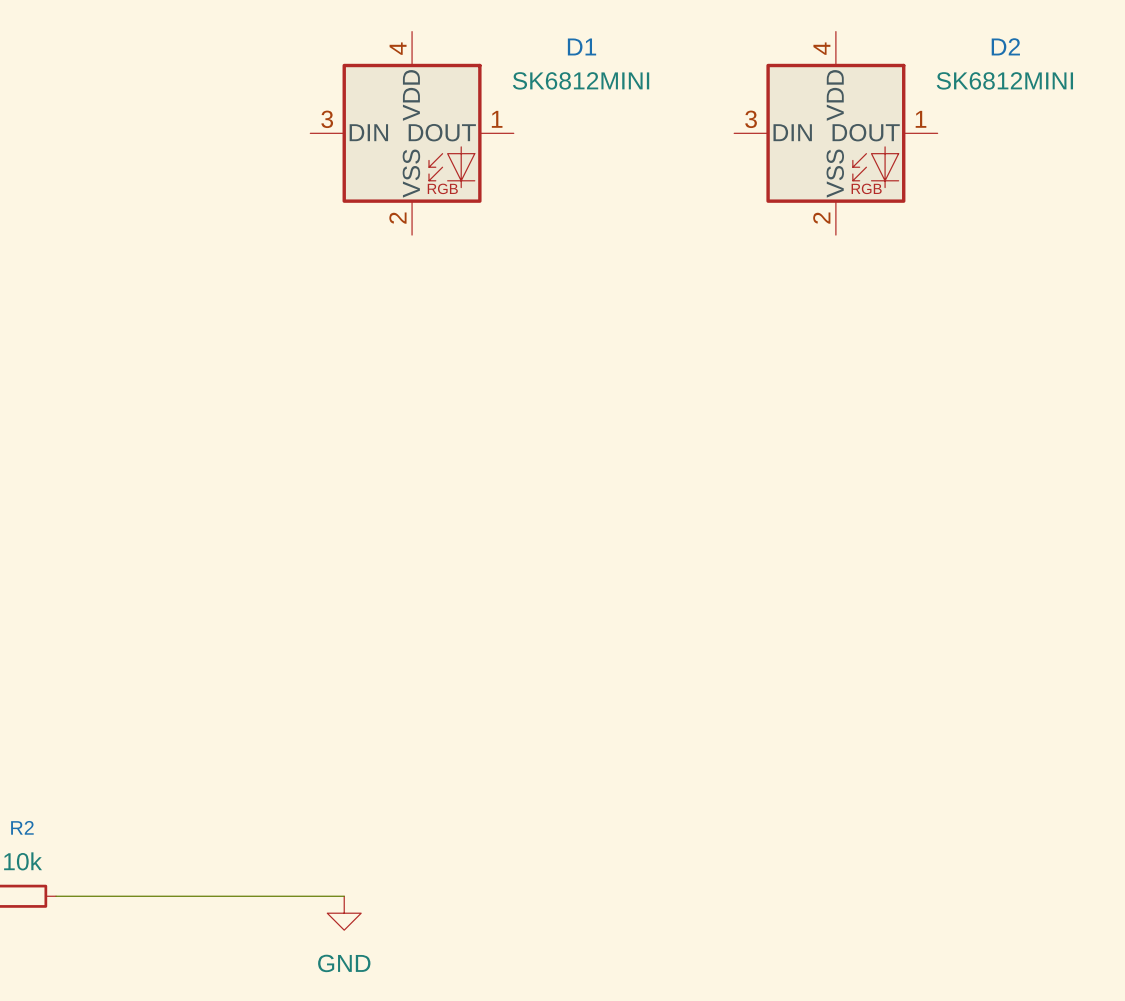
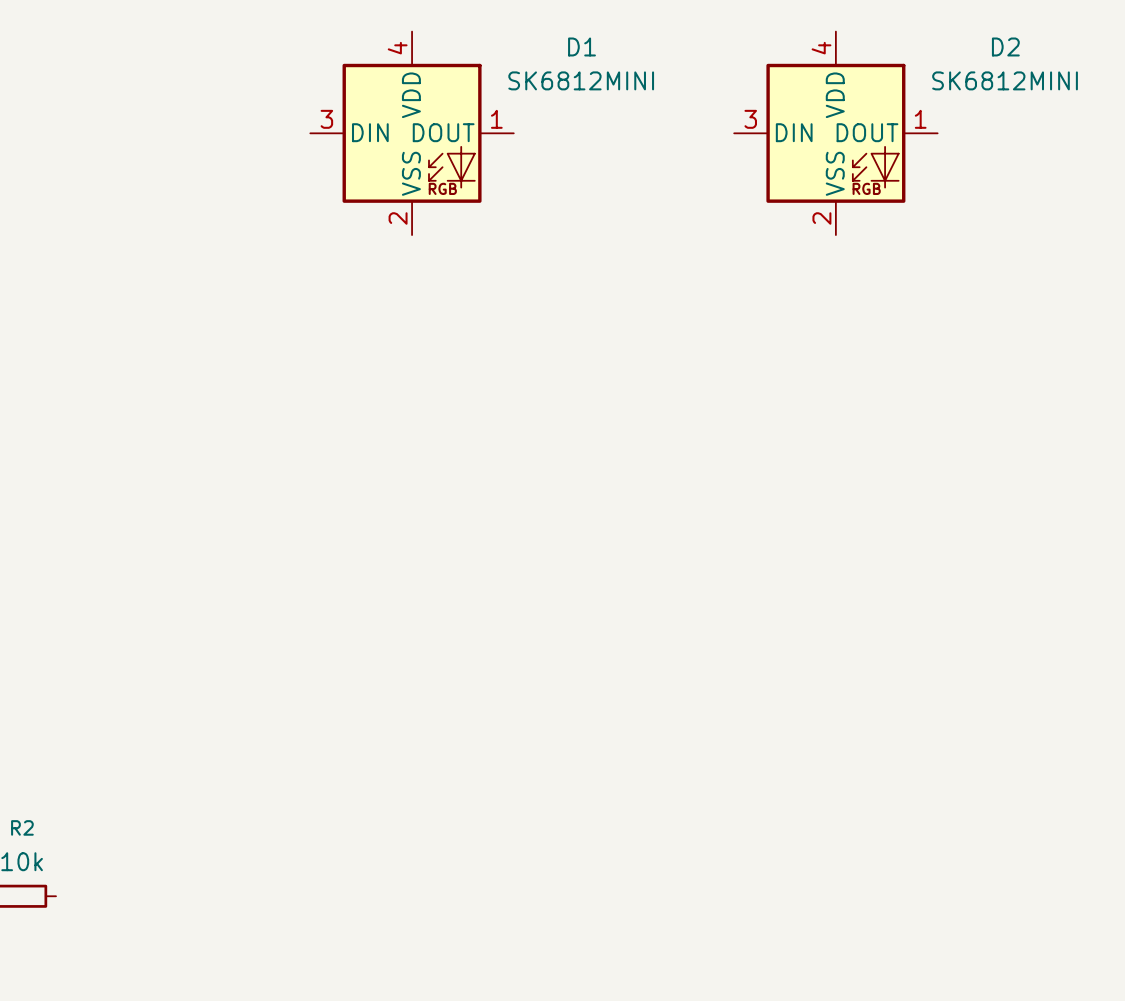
wire: (56, 896) (344, 896) -> none
power symbol: GND (344, 913) -> none

